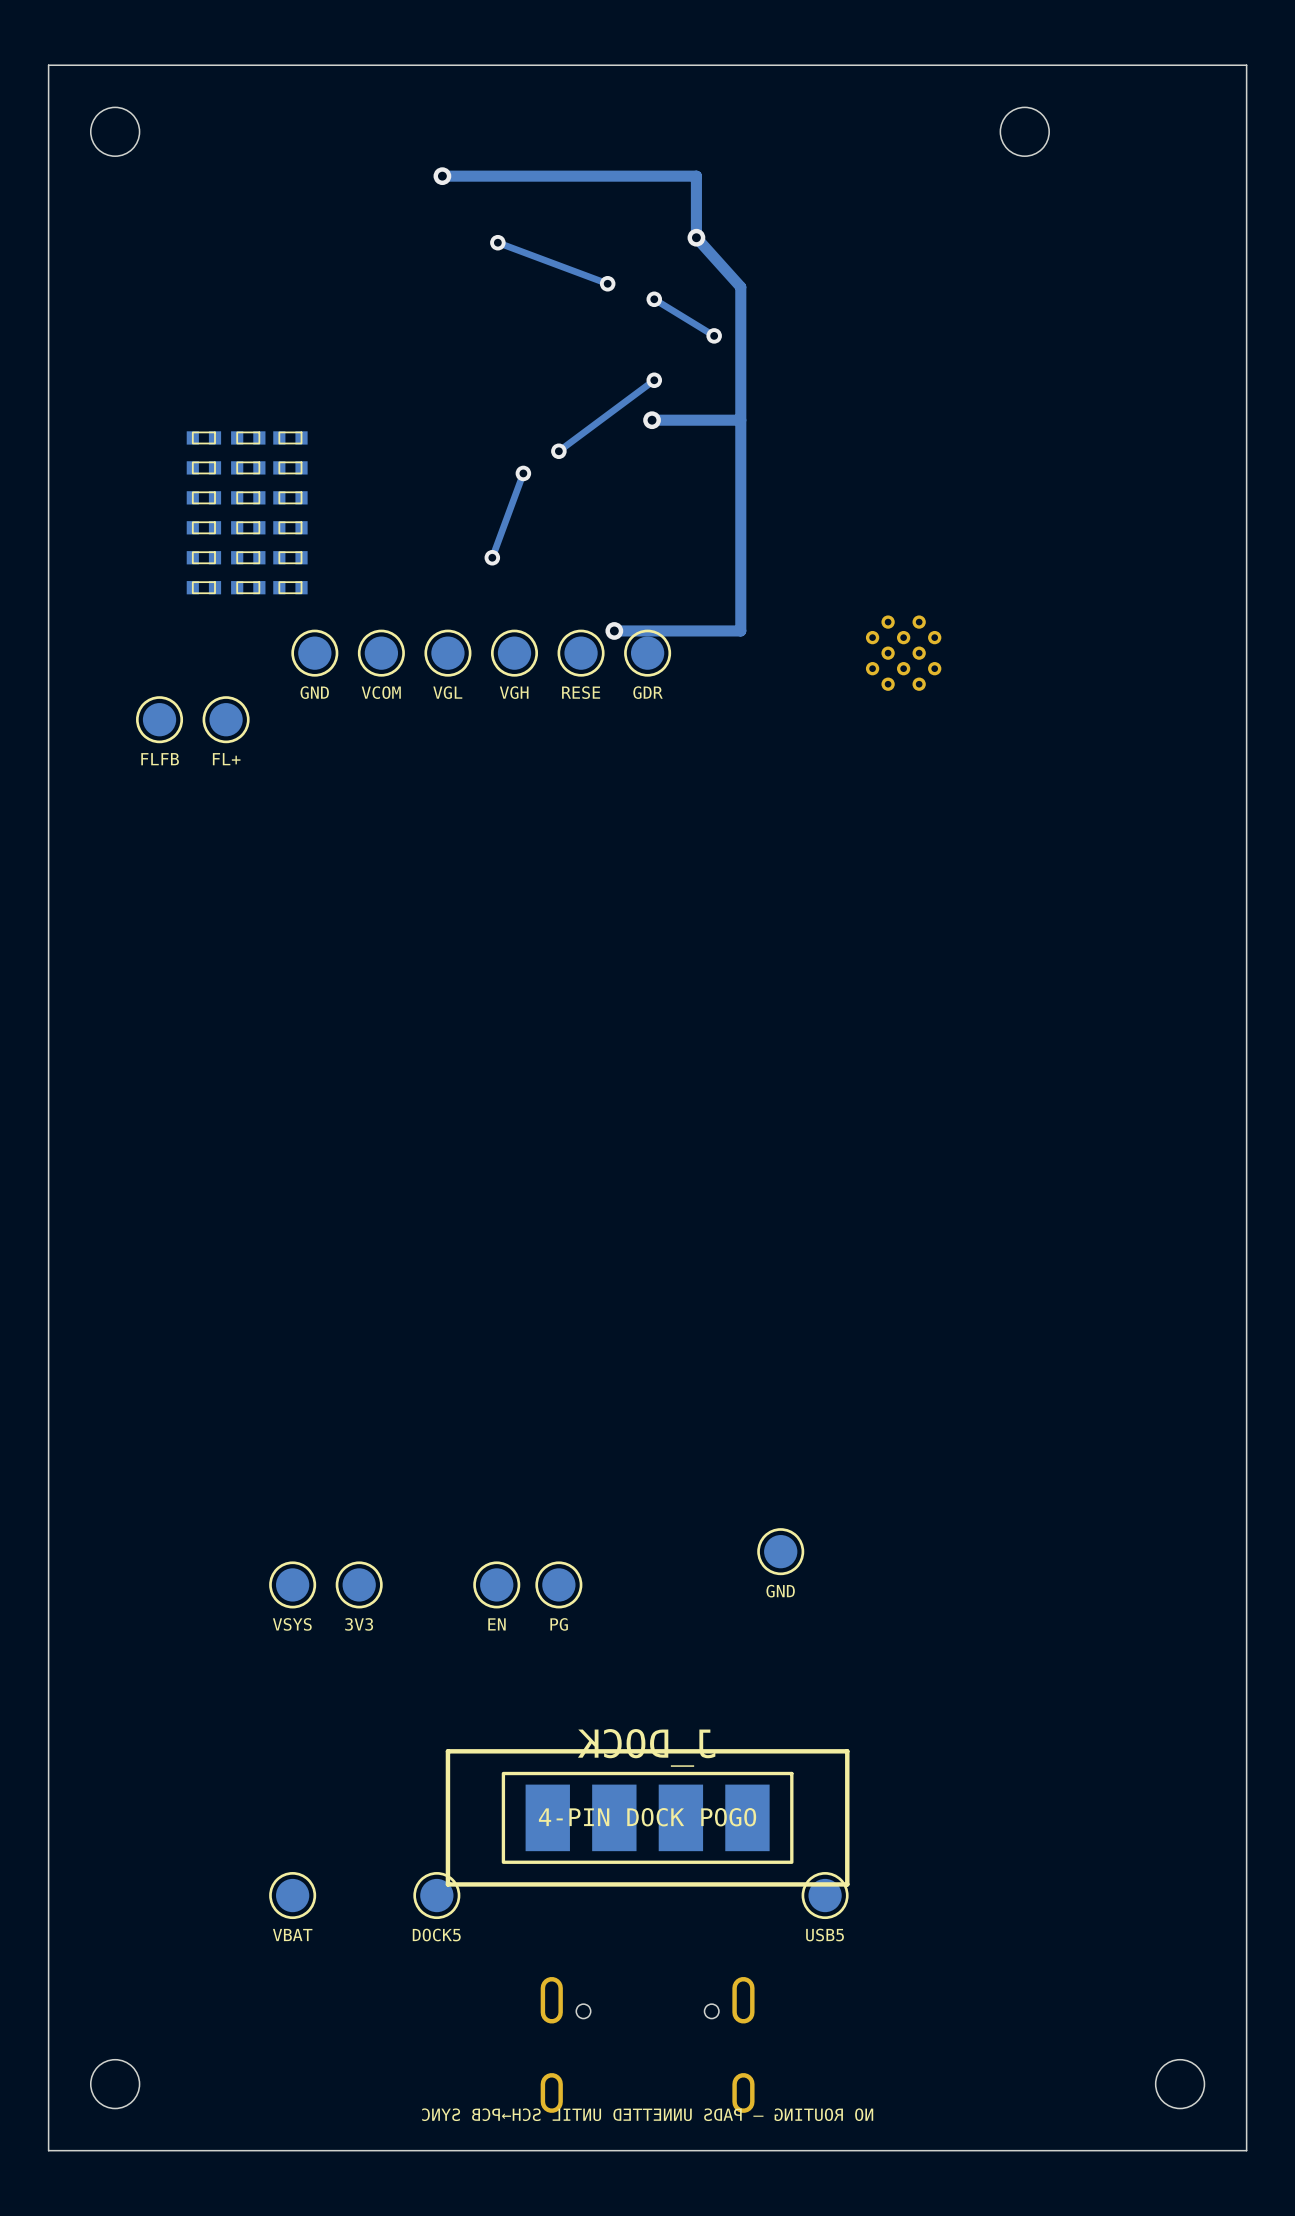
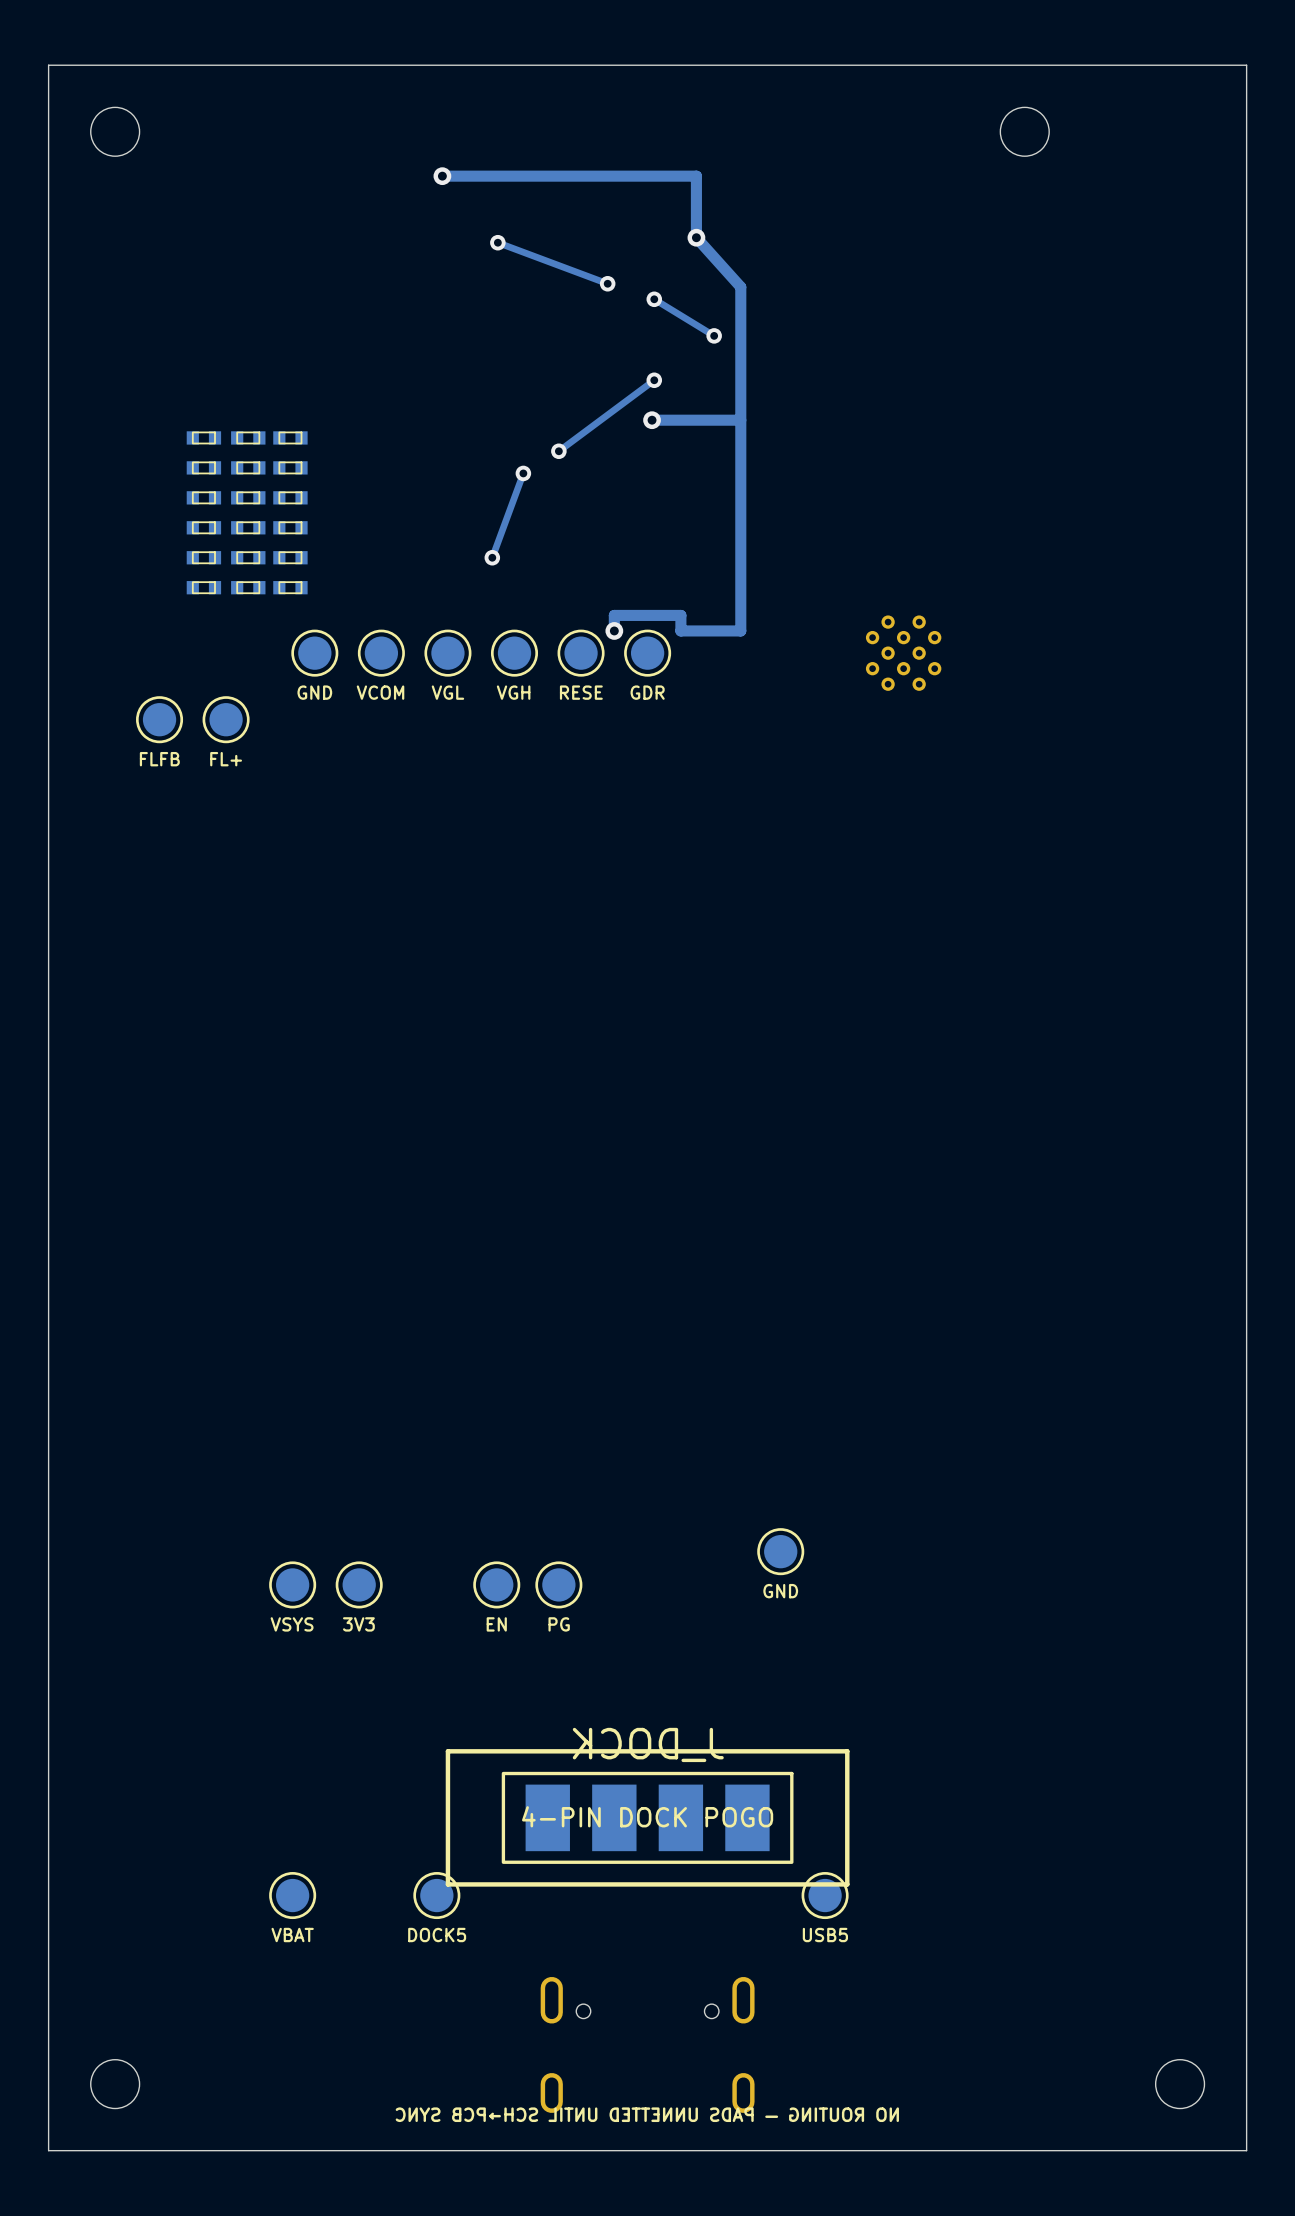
track: (680, 630) (614, 630) -> (680, 630) (680, 615) (614, 615) (614, 630)

